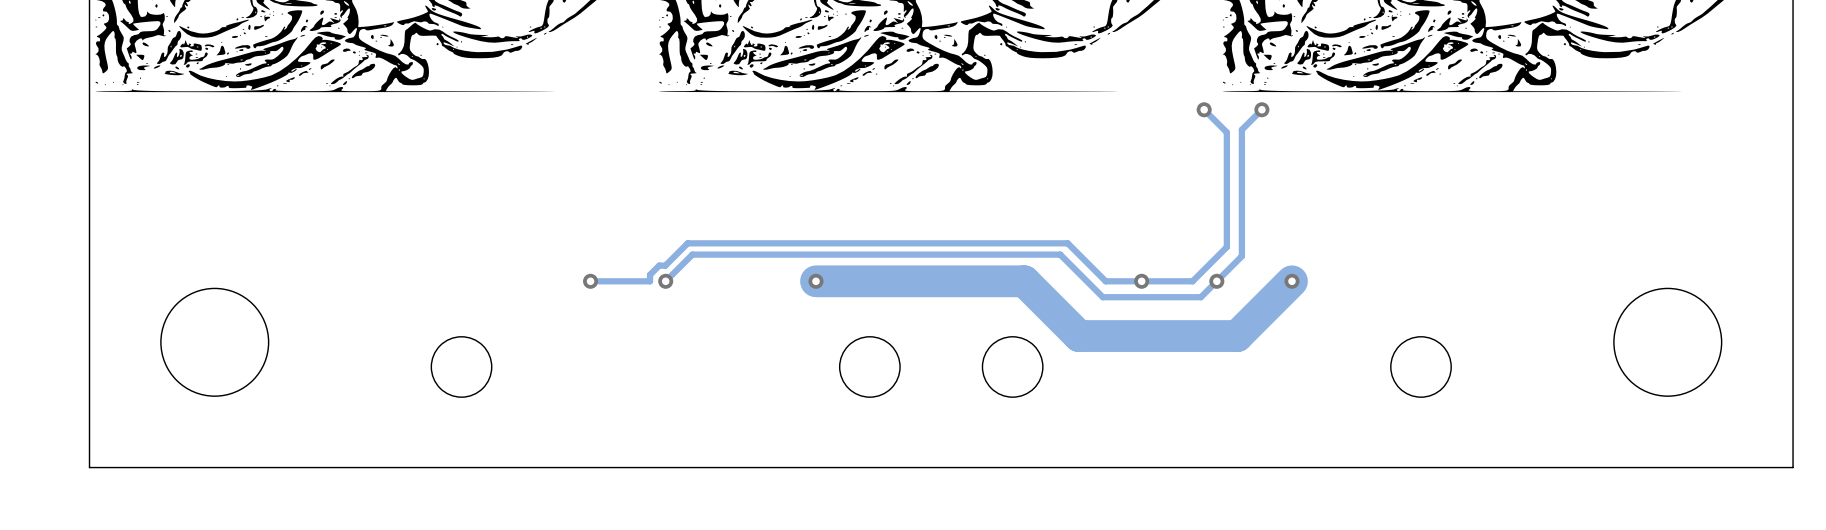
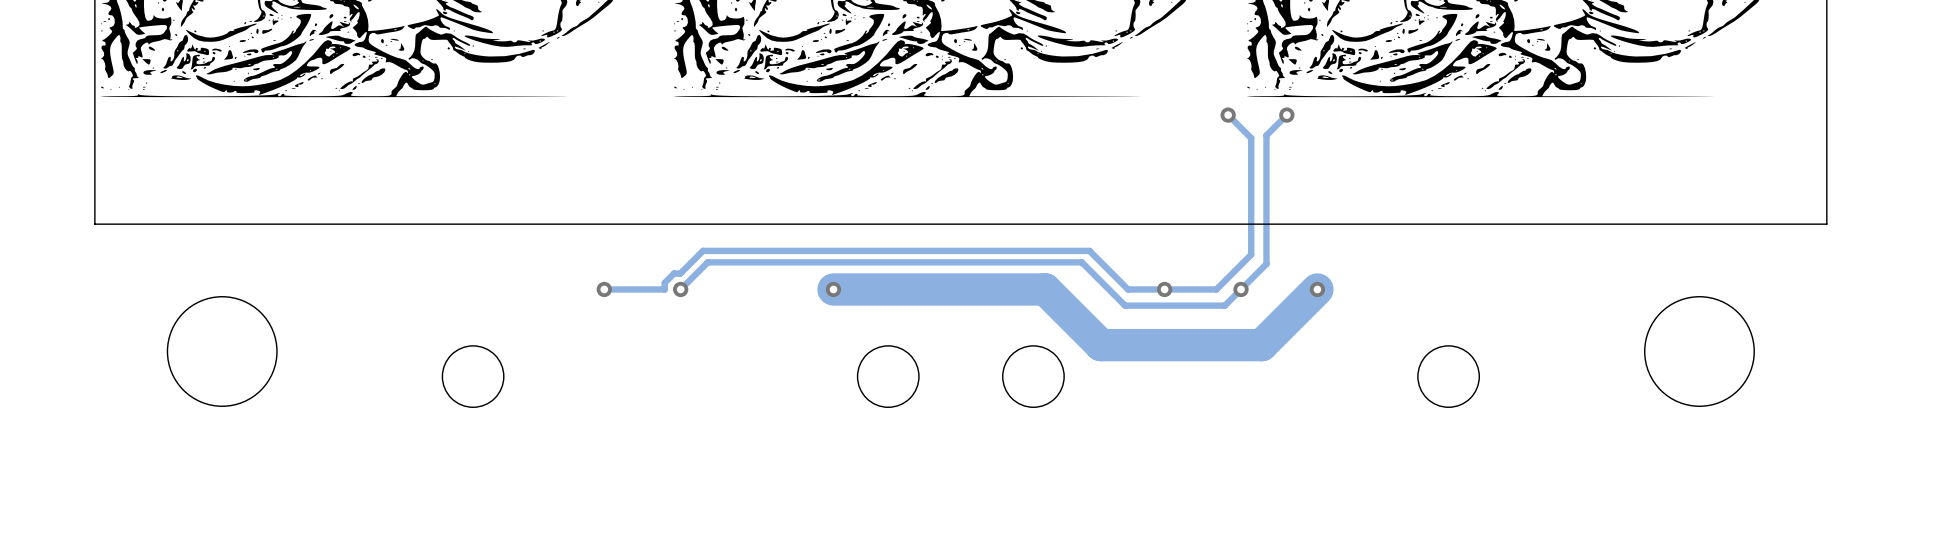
board edge: (1793, 217) (1793, 467) (89, 467) (89, 217) -> (1826, 224) (94, 224)

